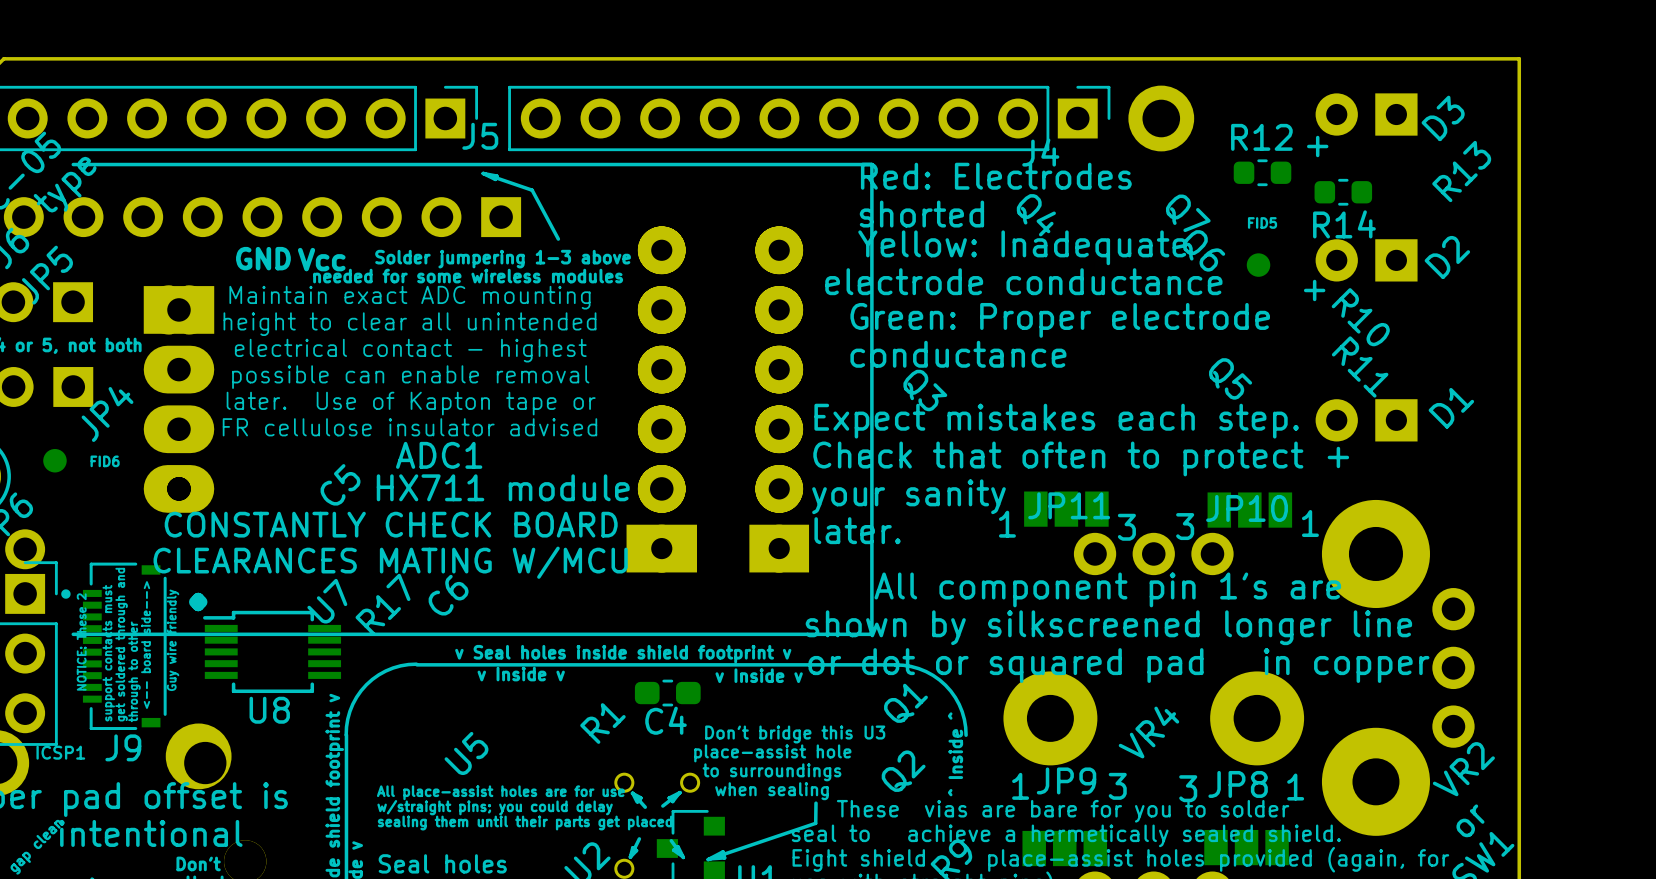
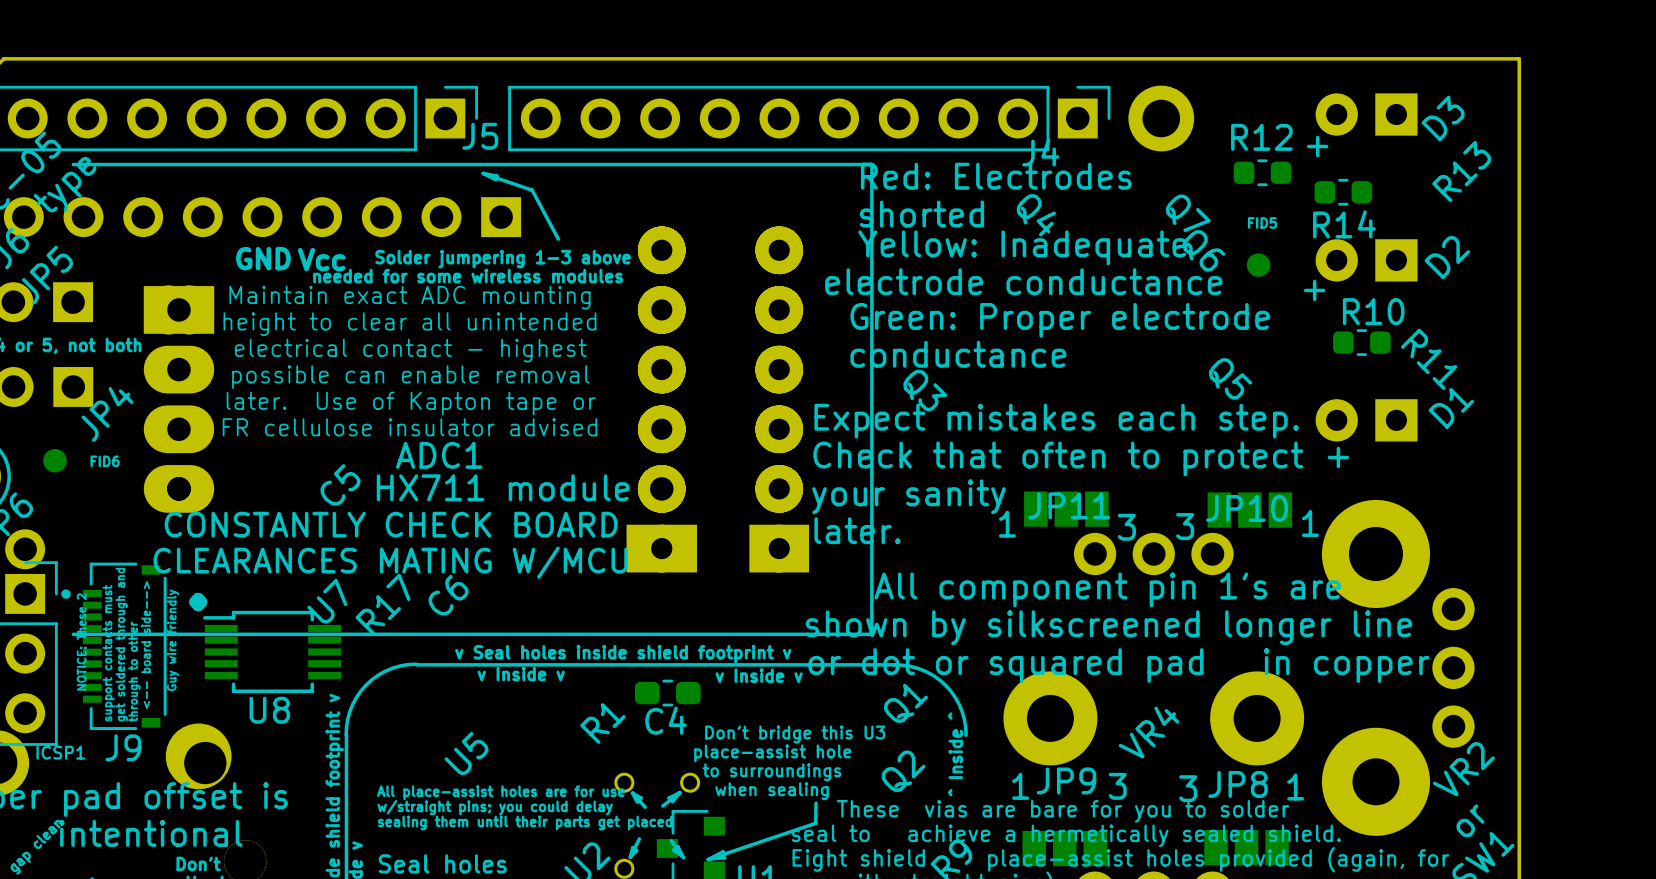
text: R10 (1360, 317) -> none
R10: none -> (1361, 342)
text position: R11 (1360, 366) -> R11 (1429, 359)

